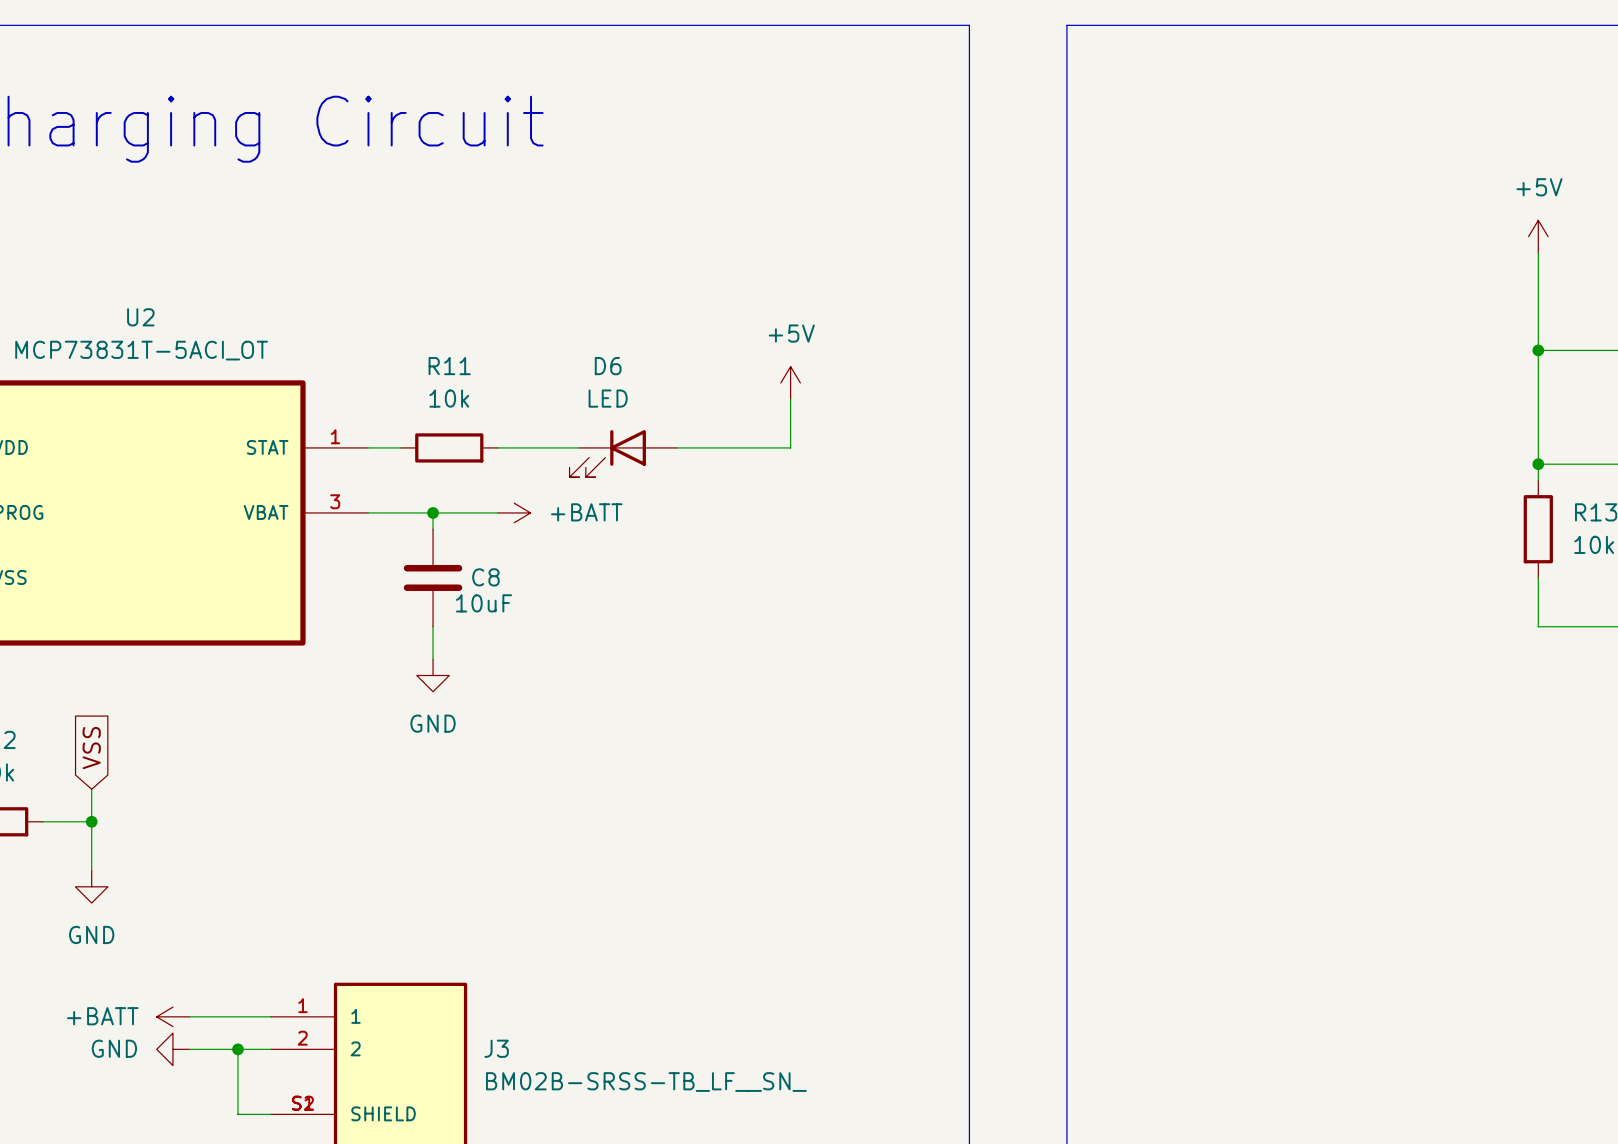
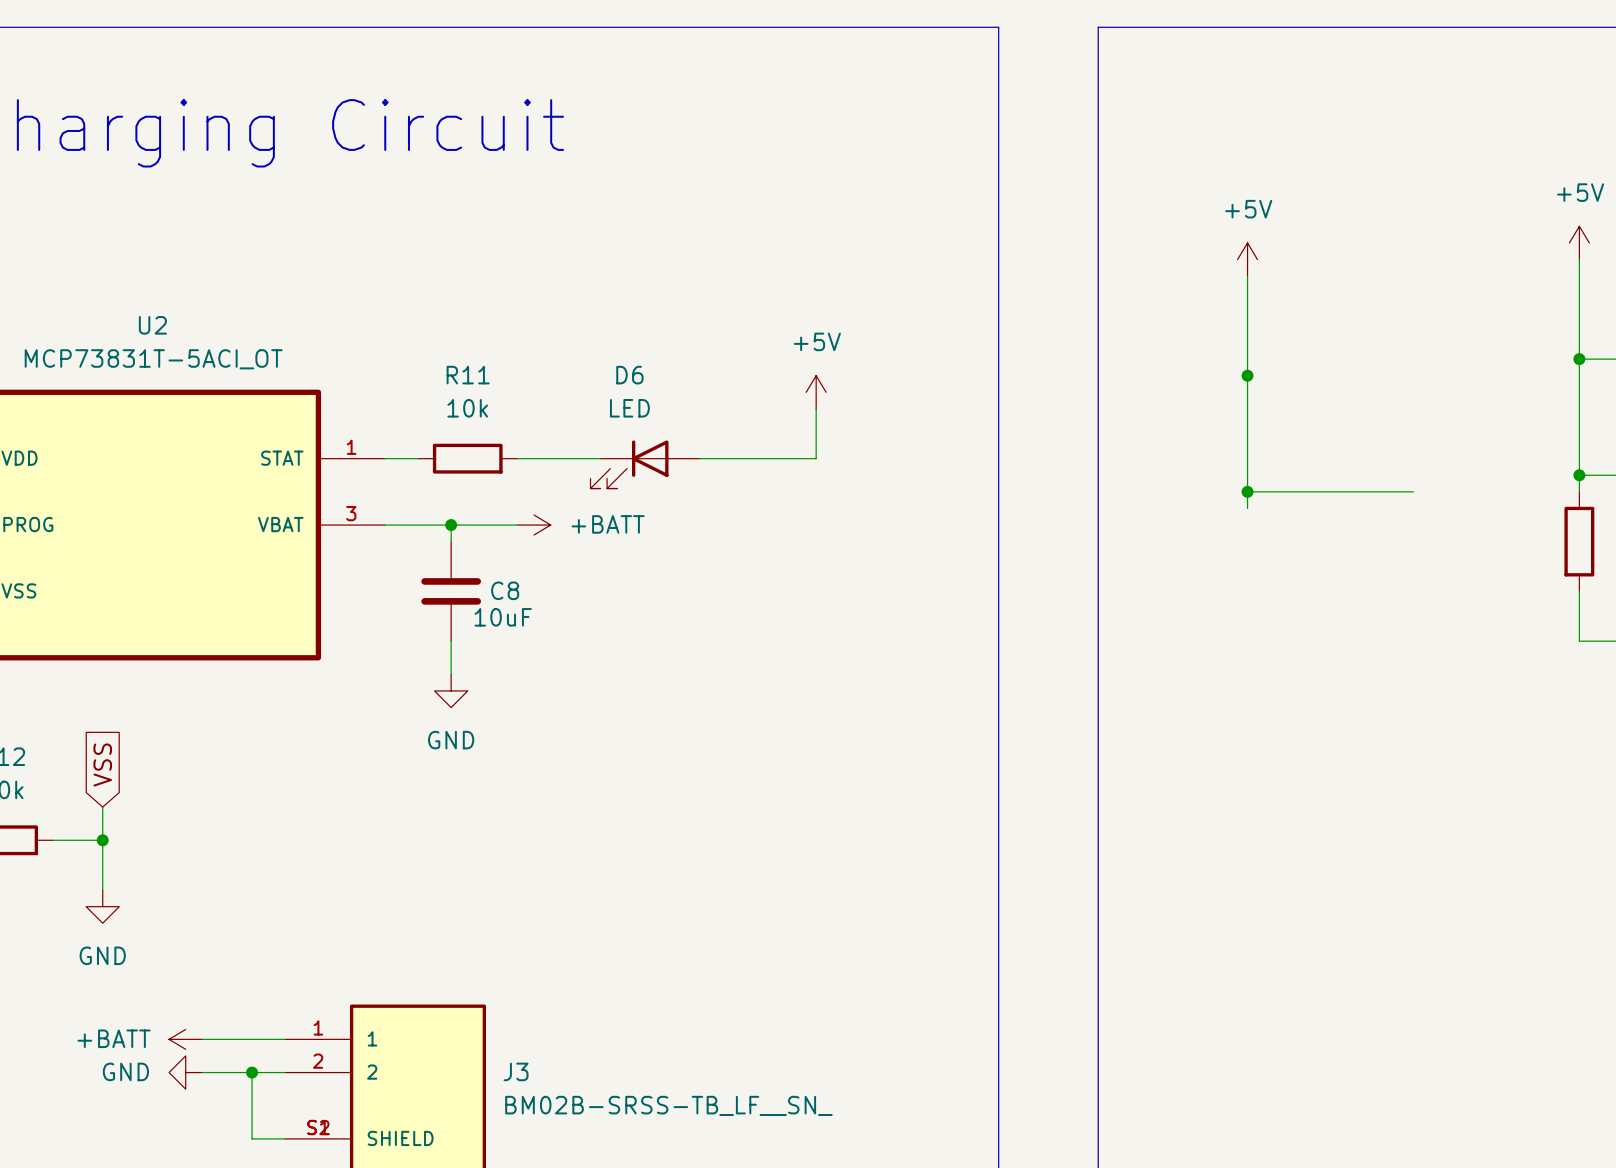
power symbol: none -> +5V (1247, 259)
wire: none -> (1247, 276) (1247, 508)
junction: none -> (1247, 375)
wire: none -> (1247, 491) (1413, 491)
junction: none -> (1247, 491)

